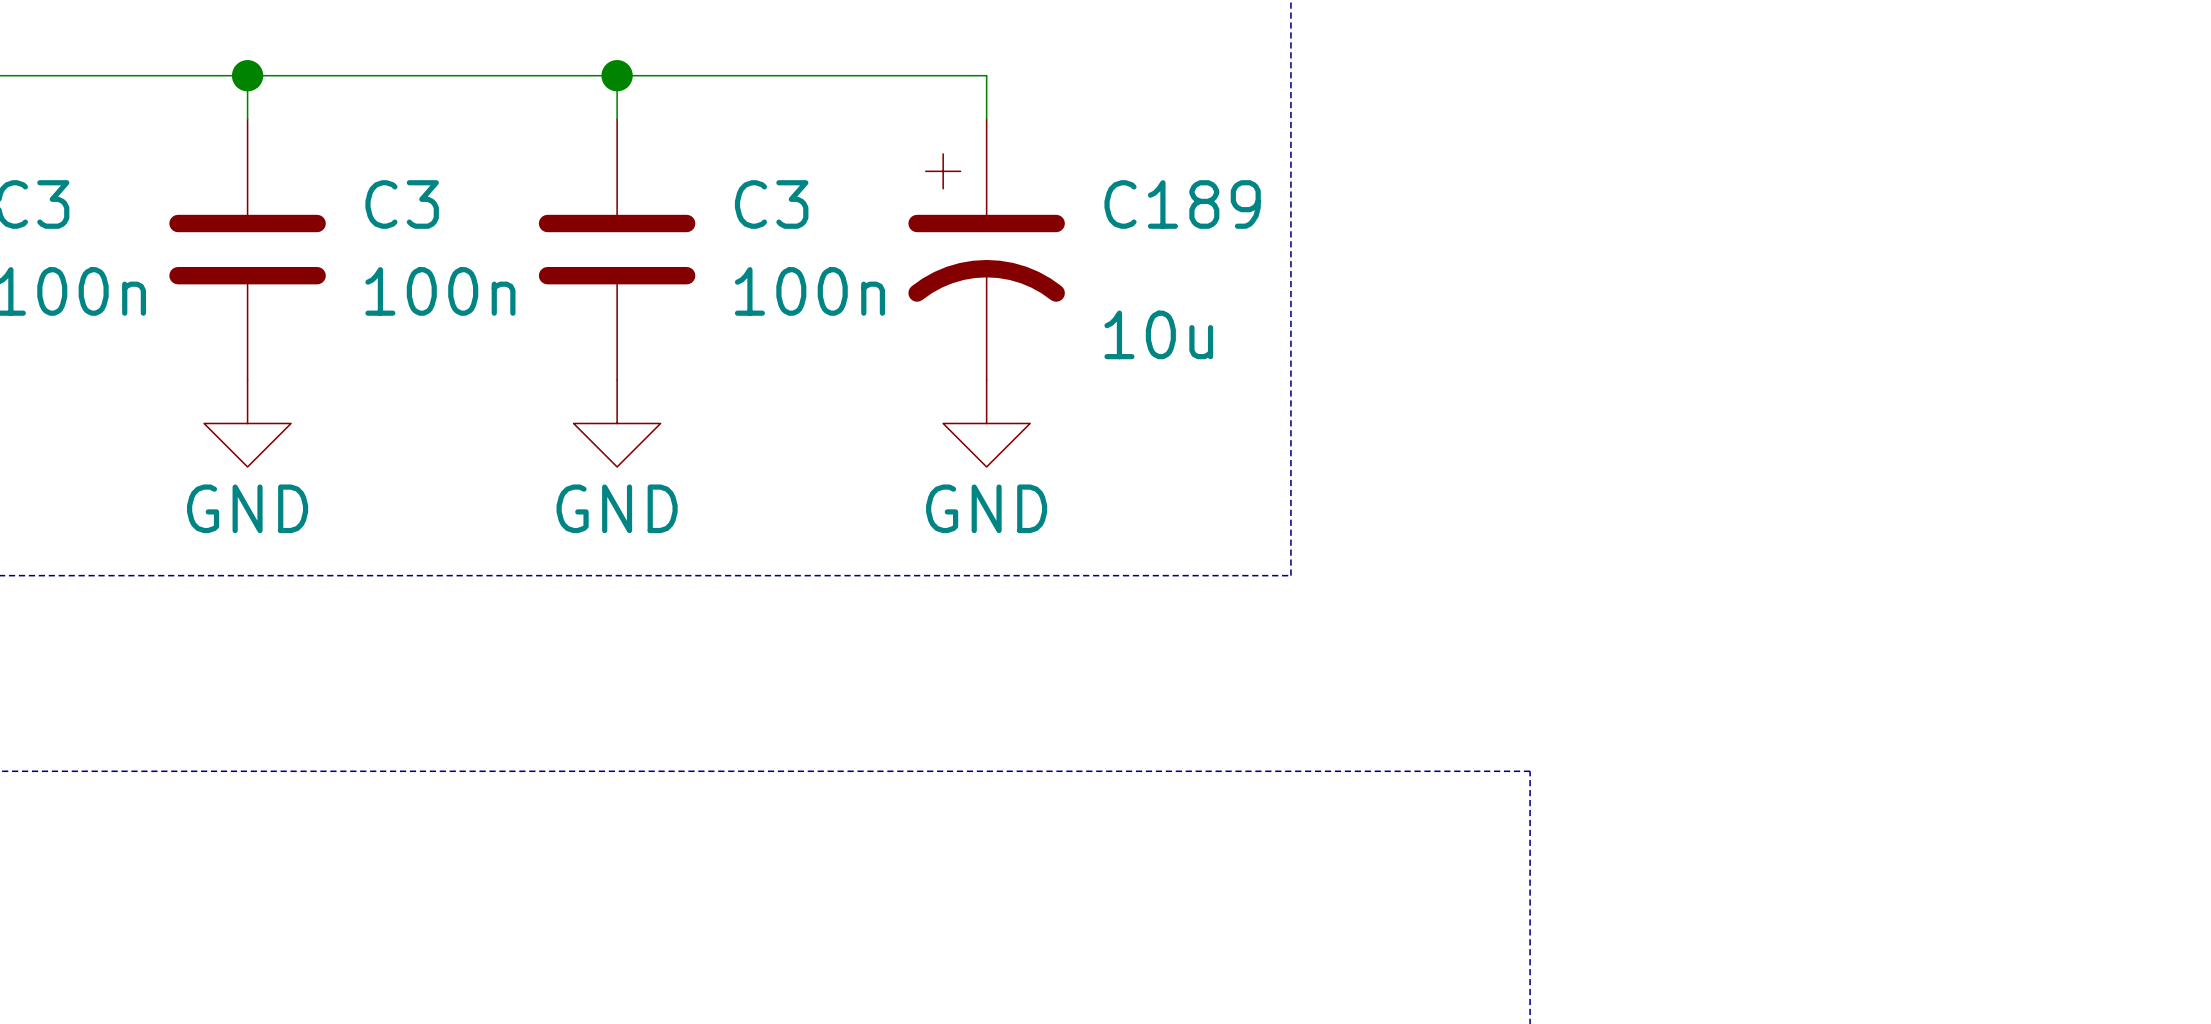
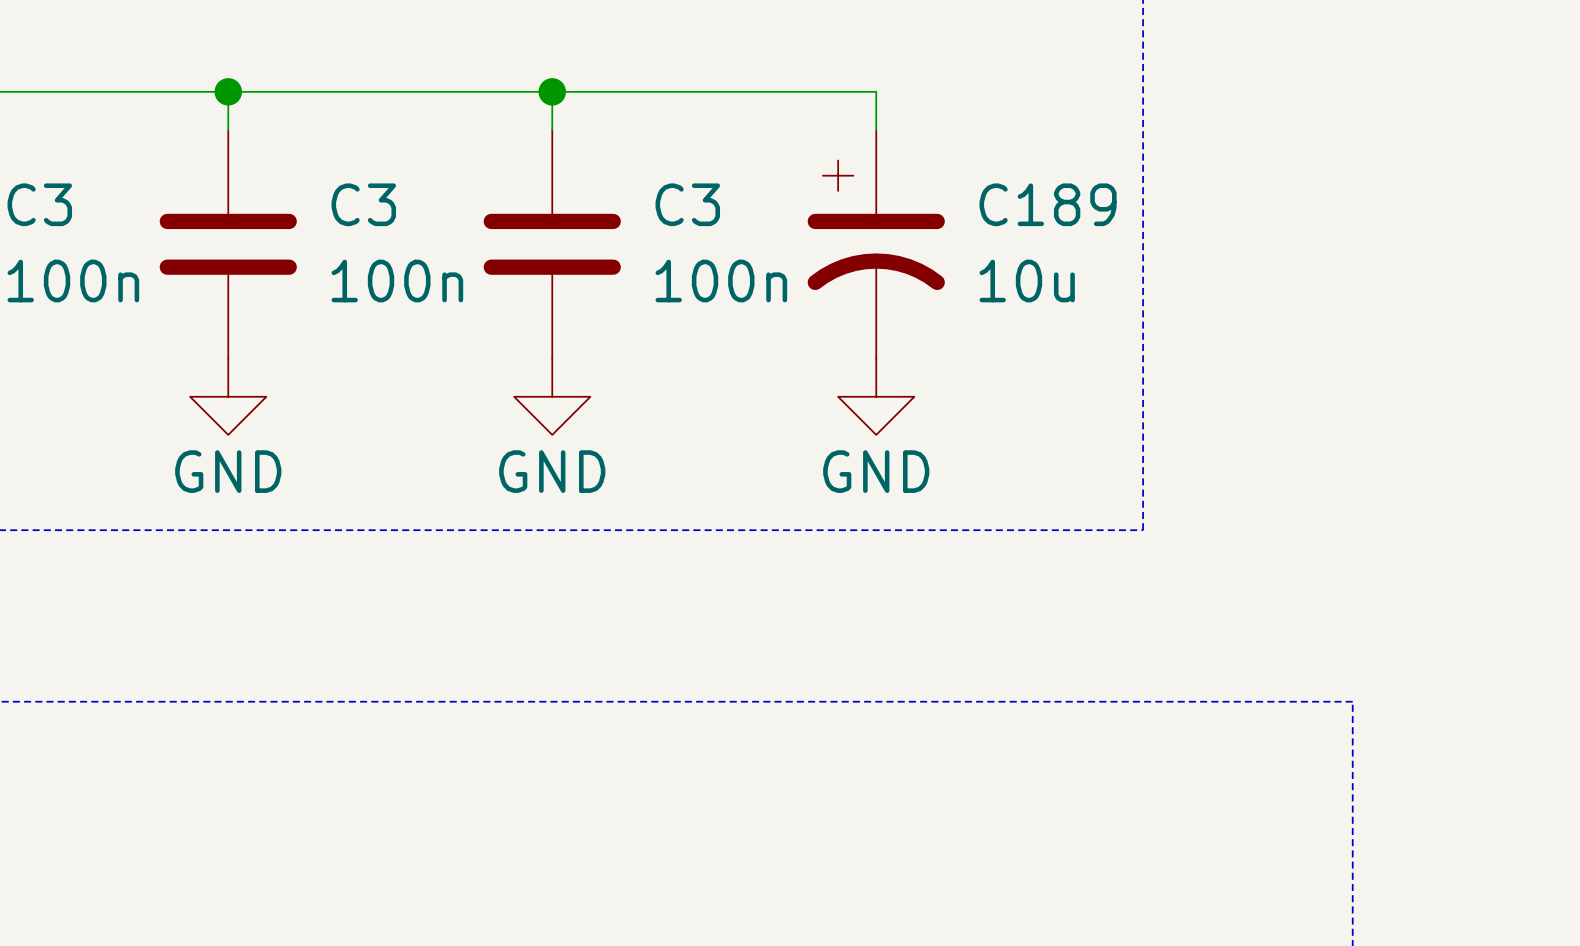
C189 value position: 10u (1158, 334) -> 10u (1027, 281)

